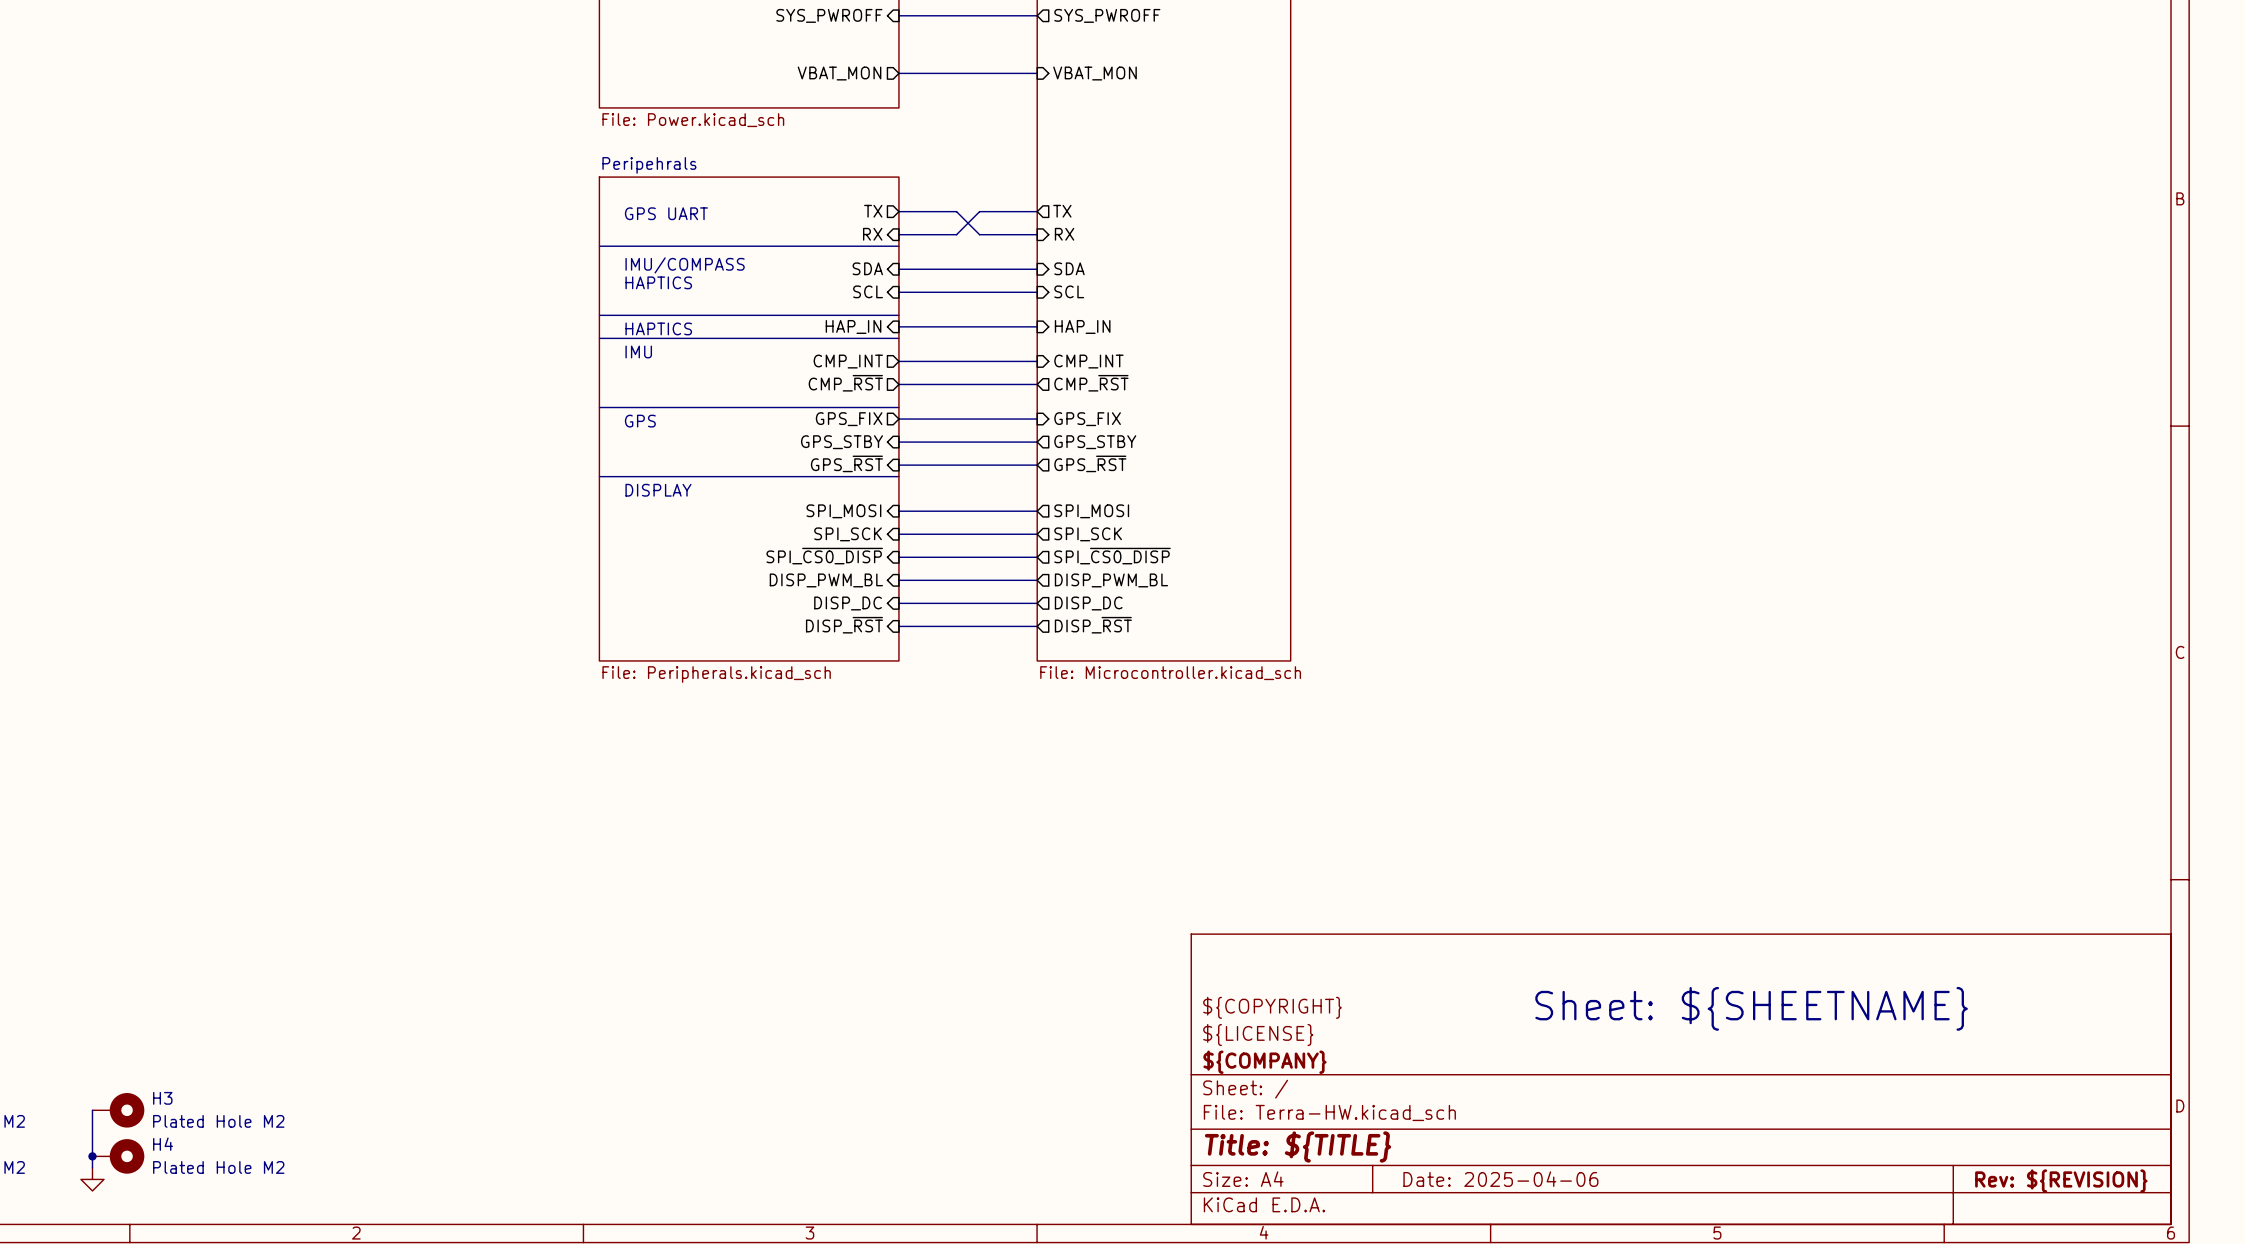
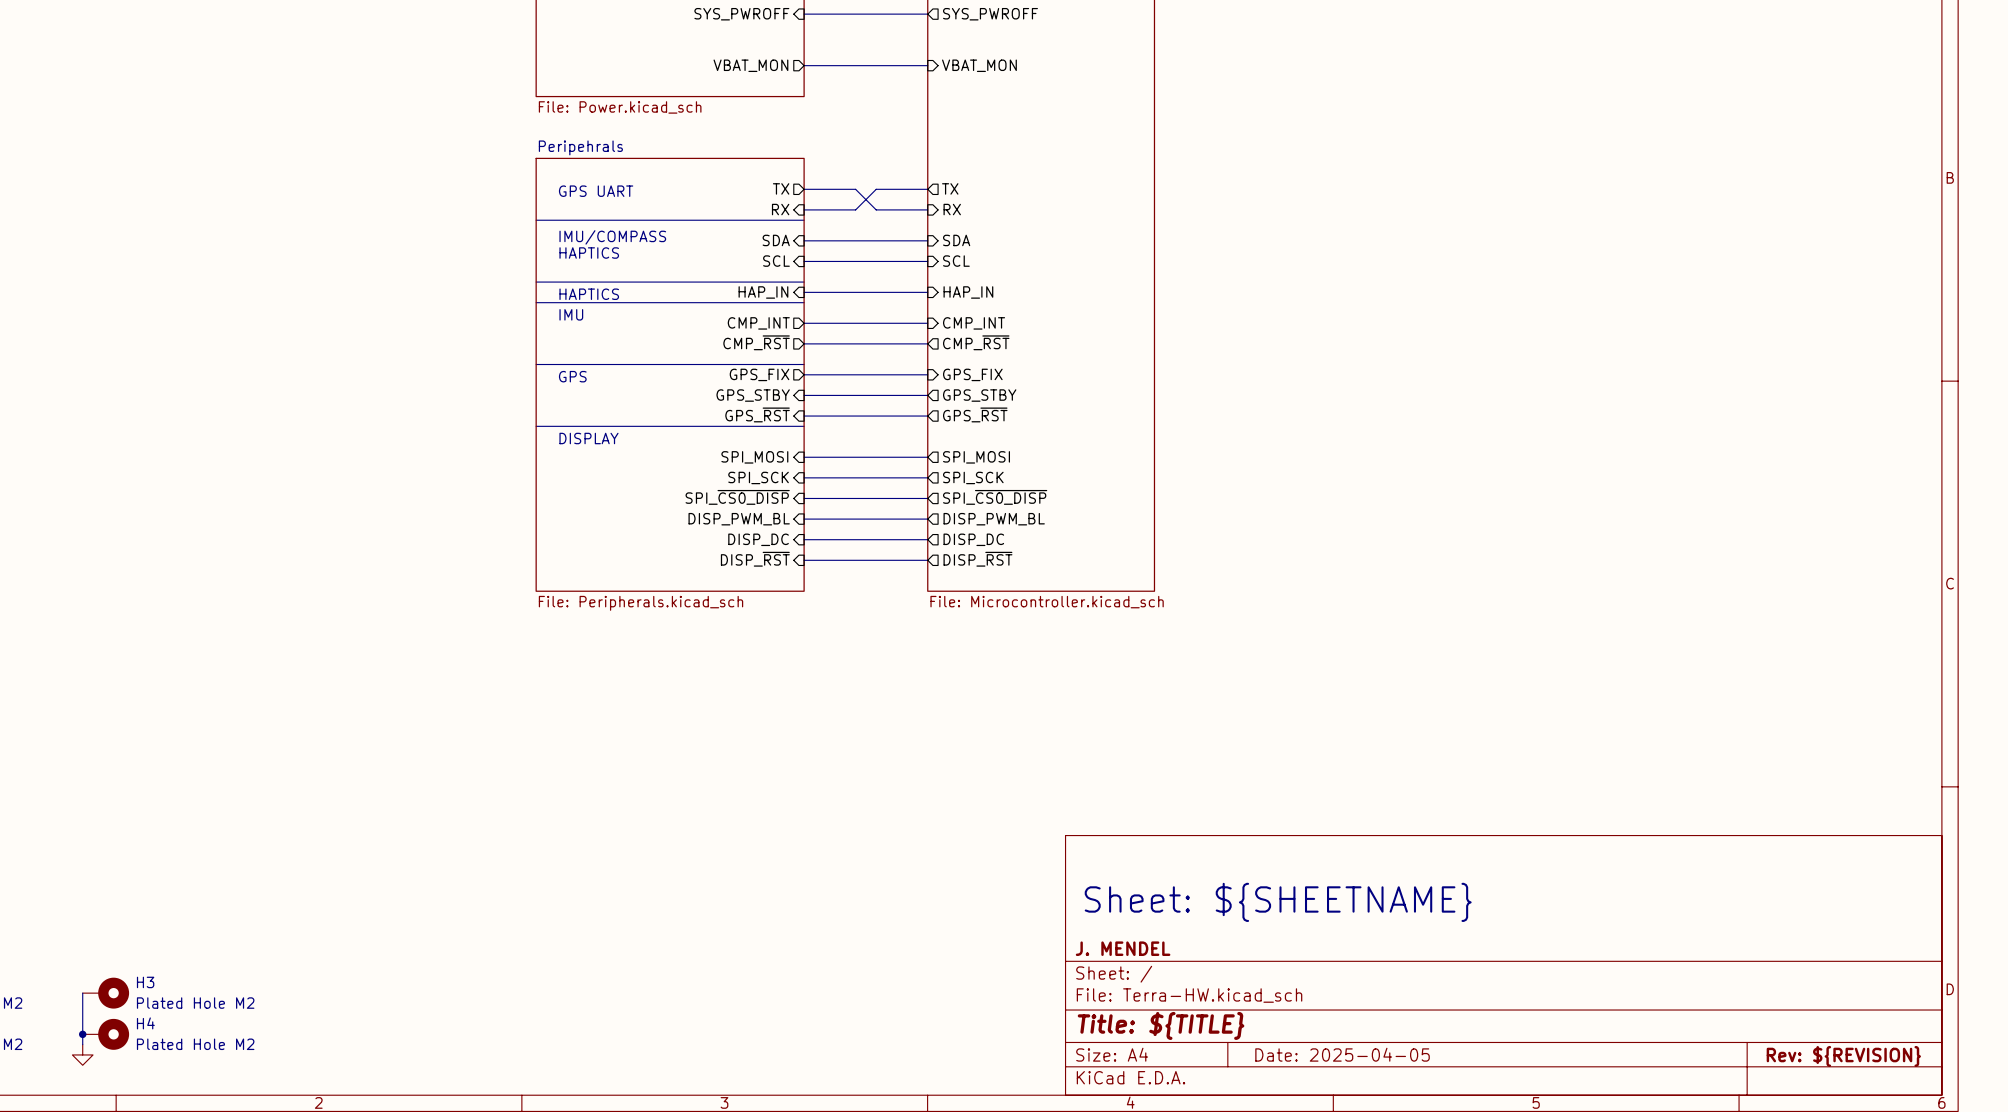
title block: ${COPYRIGHT} (1272, 1007) -> none
text: none -> Sheet: ${SHEETNAME} (1278, 902)
text: Sheet: ${SHEETNAME} (1751, 1008) -> none
title block: ${LICENSE} (1258, 1035) -> none
title block: ${COMPANY} (1264, 1062) -> J. MENDEL (1123, 948)
title block: Date: 2025-04-06 (1500, 1179) -> Date: 2025-04-05 (1342, 1054)

